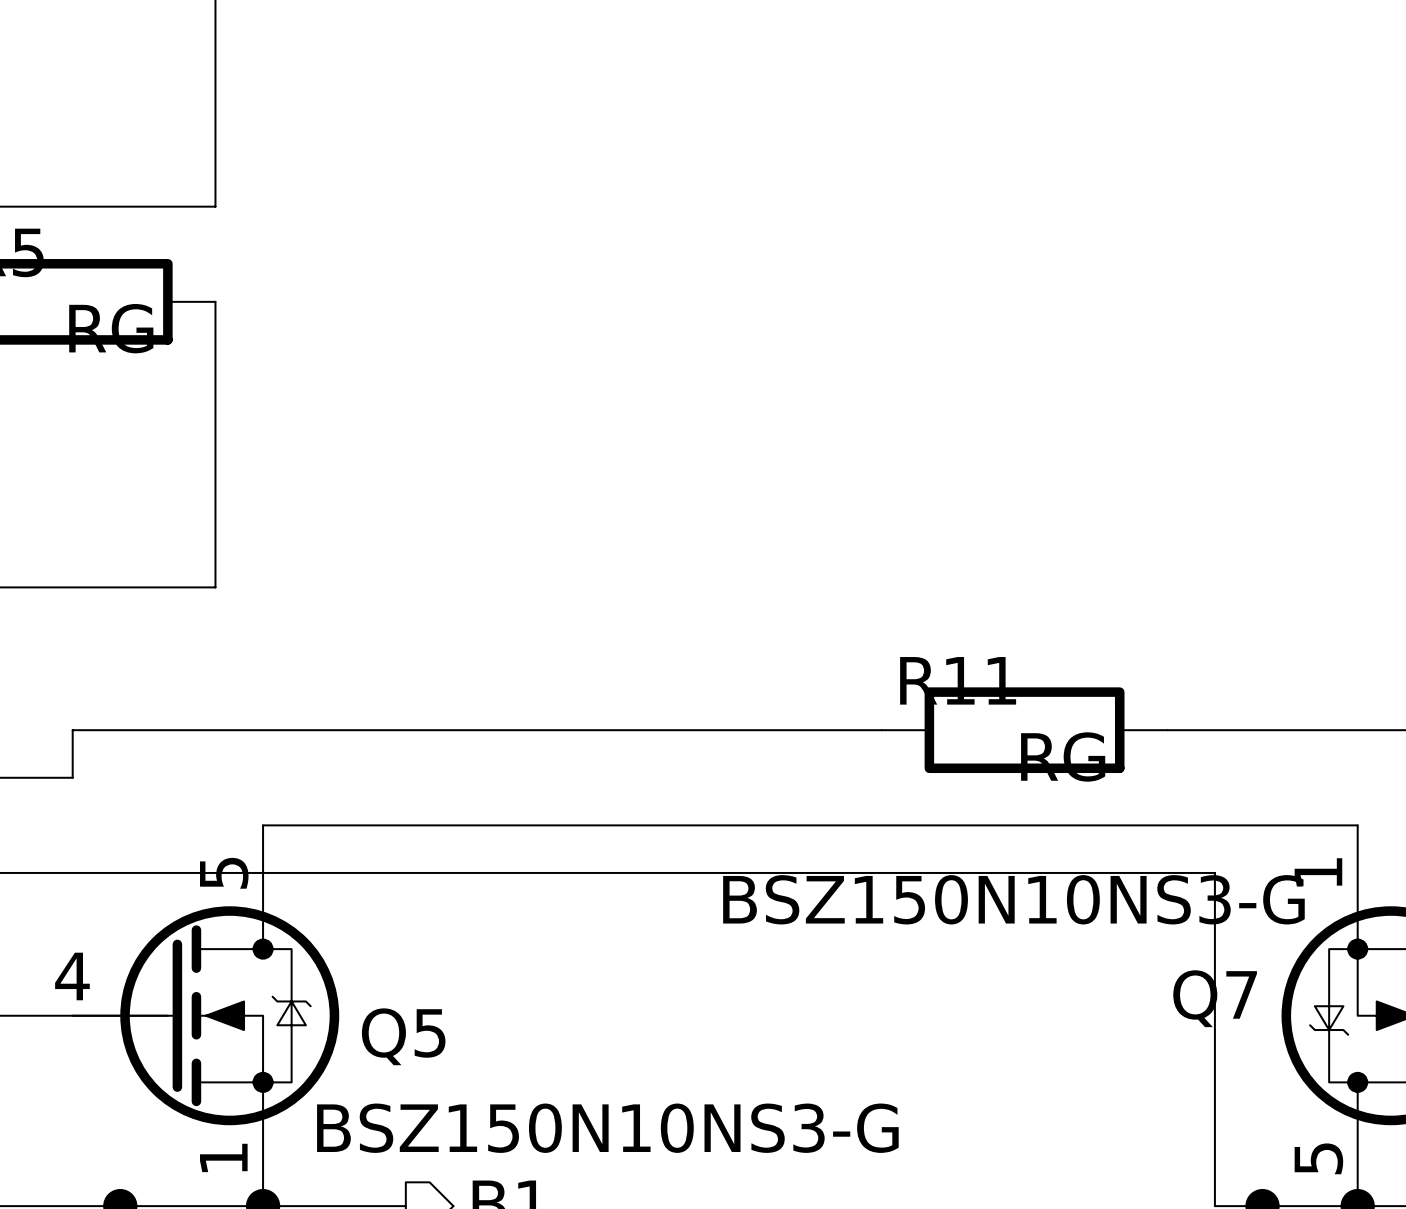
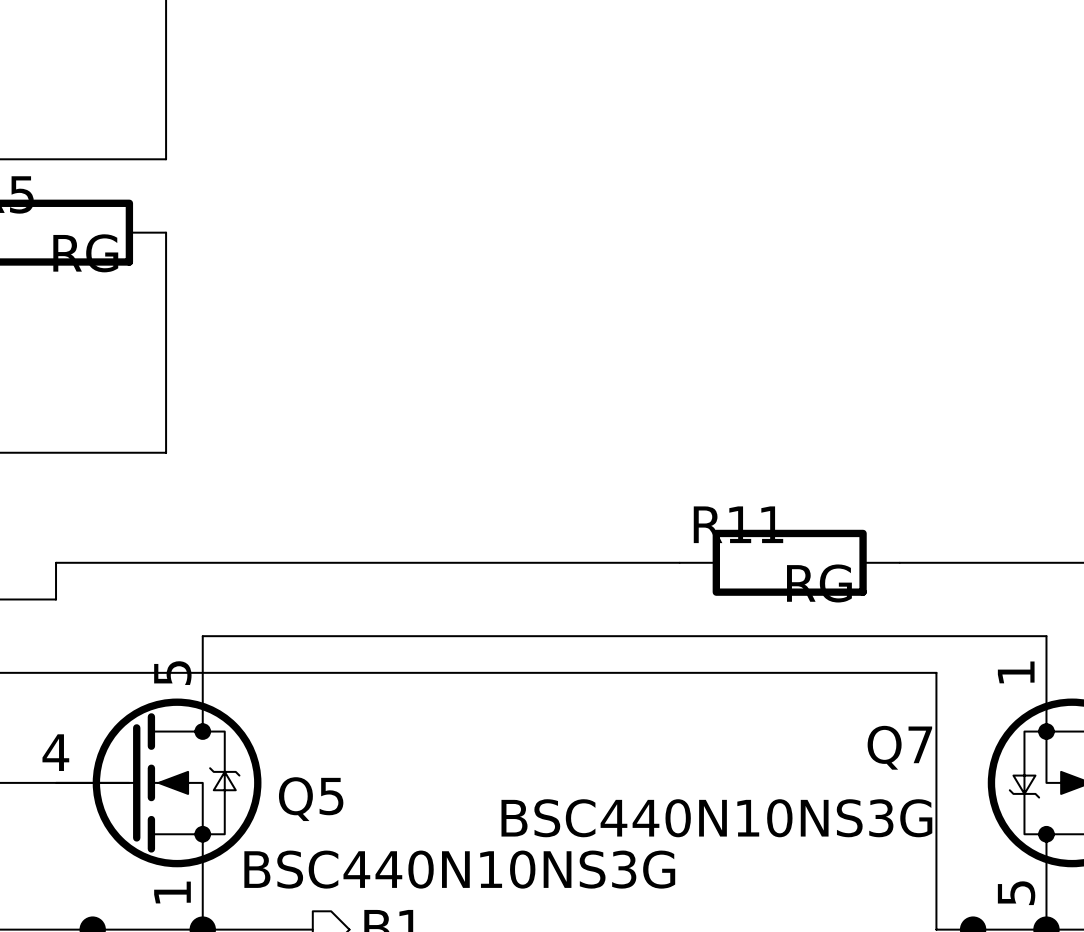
Q7 value: BSZ150N10NS3-G (1013, 899) -> BSC440N10NS3G (716, 818)
Q7 name position: Q7 (1215, 998) -> Q7 (899, 747)
Q5 value: BSZ150N10NS3-G (607, 1128) -> BSC440N10NS3G (459, 869)

